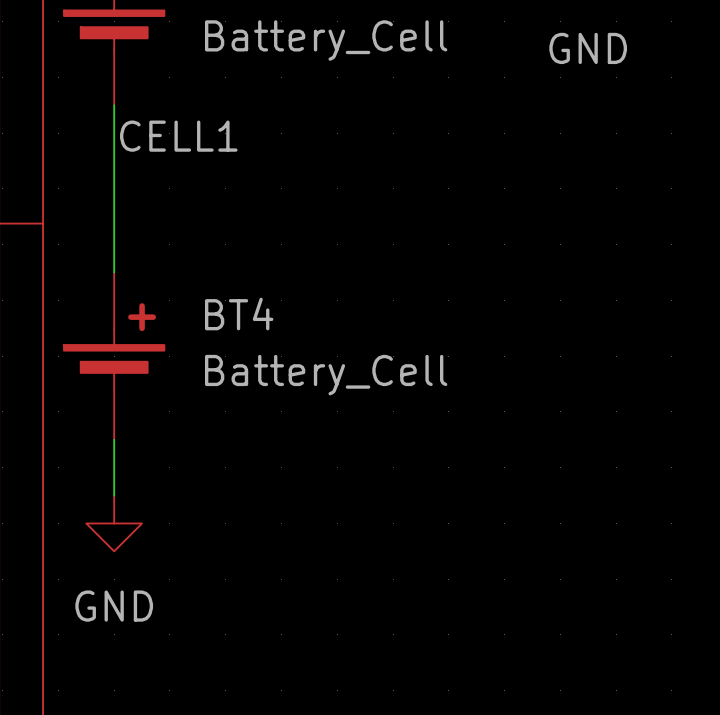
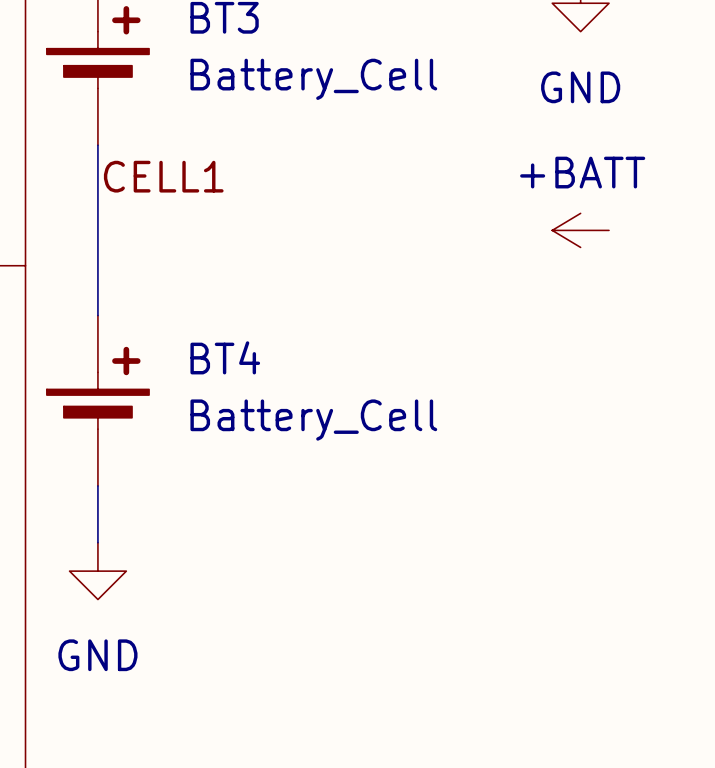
power symbol: none -> +BATT (580, 230)

